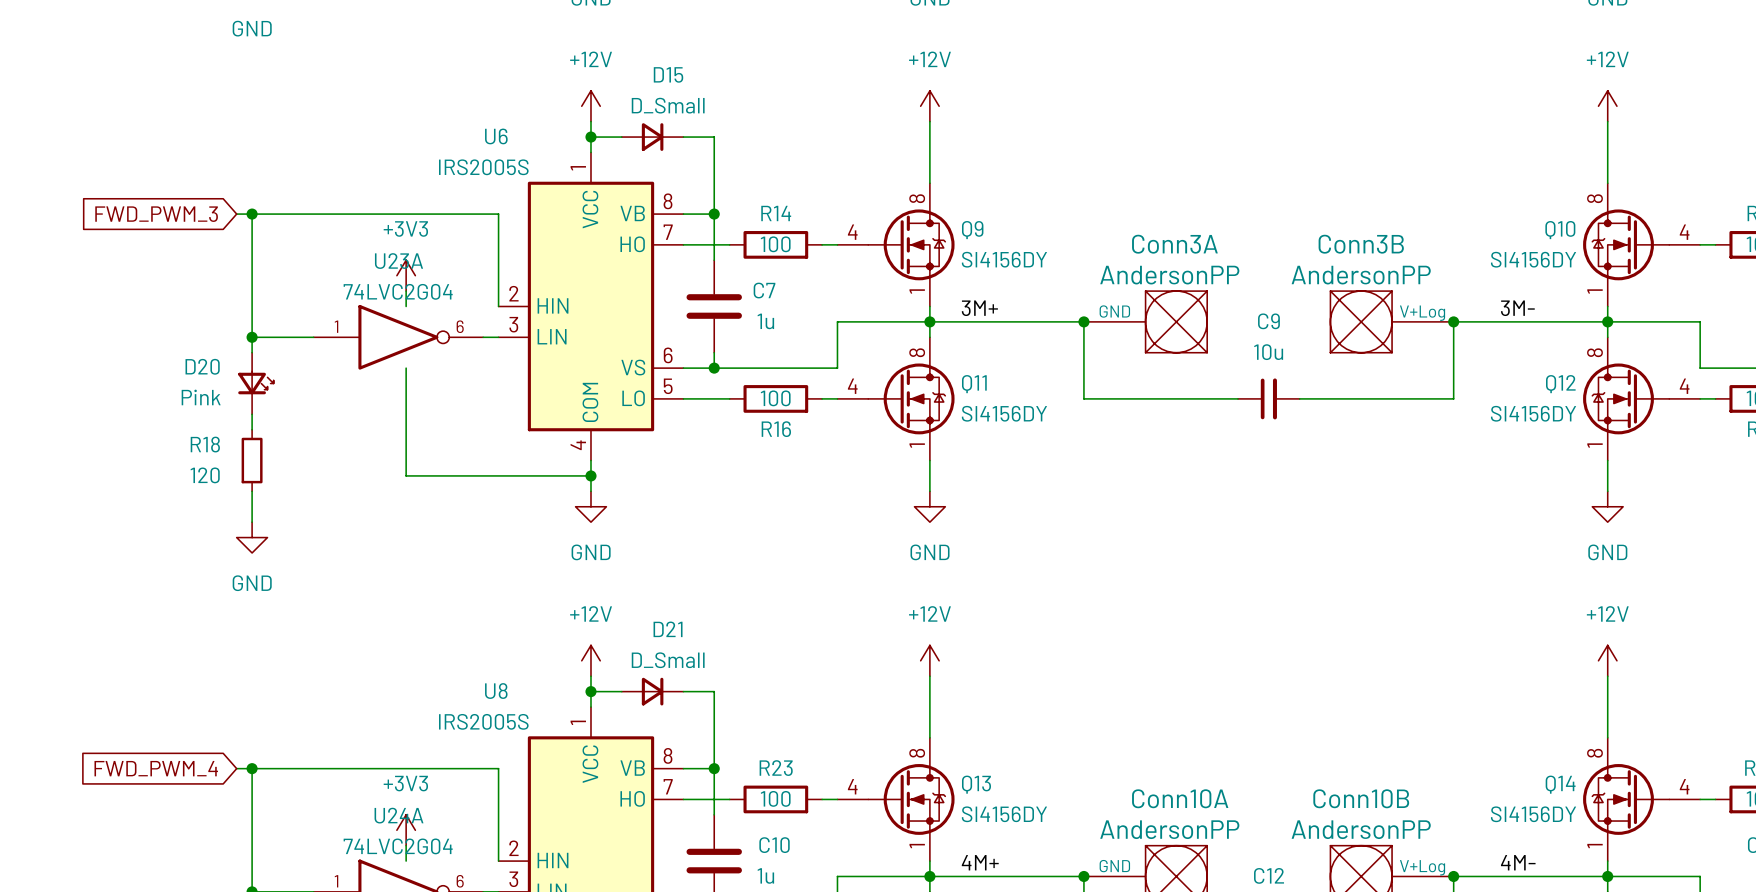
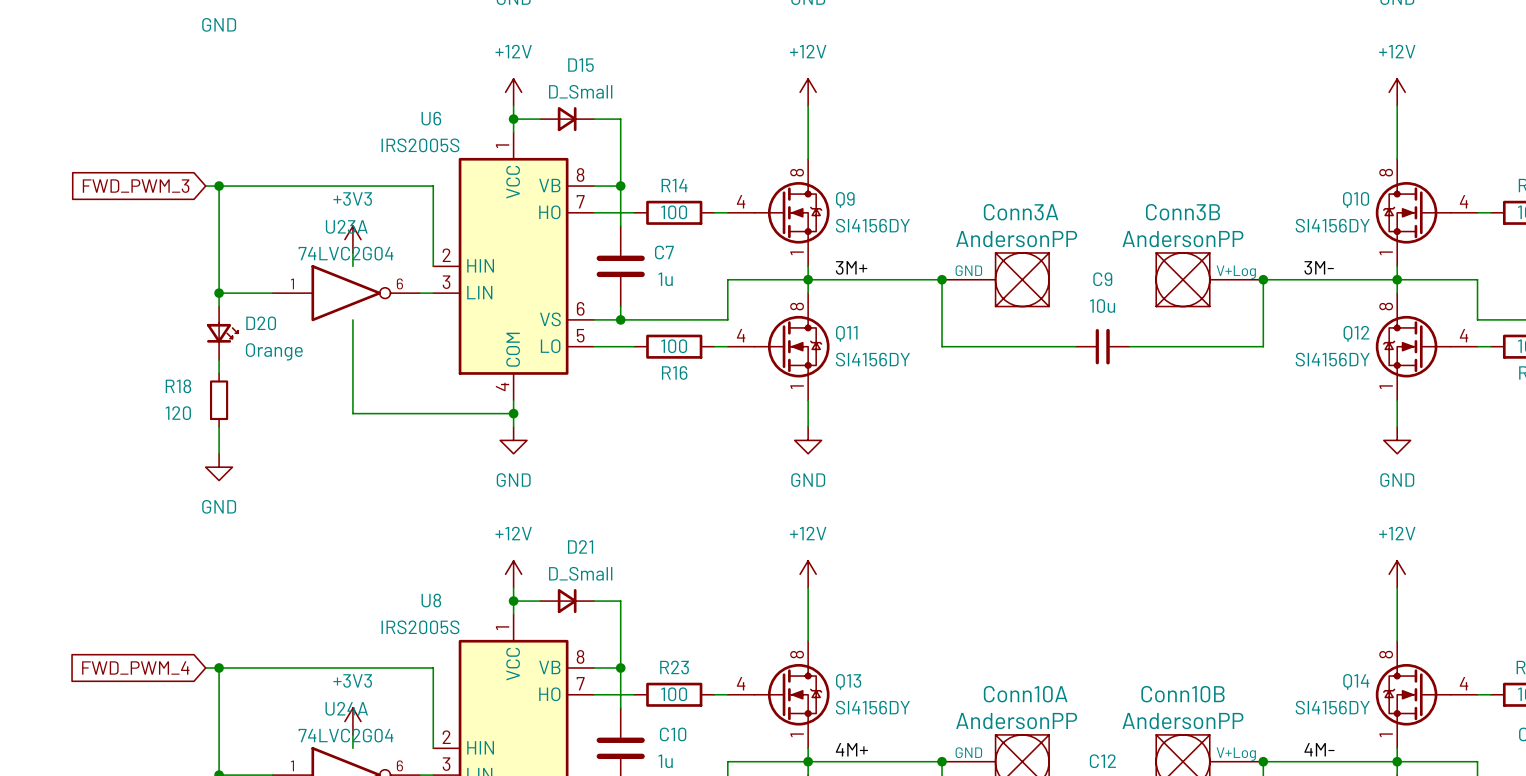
D20 name position: D20 (202, 366) -> D20 (261, 323)
D20 value: Pink (201, 397) -> Orange (274, 351)

